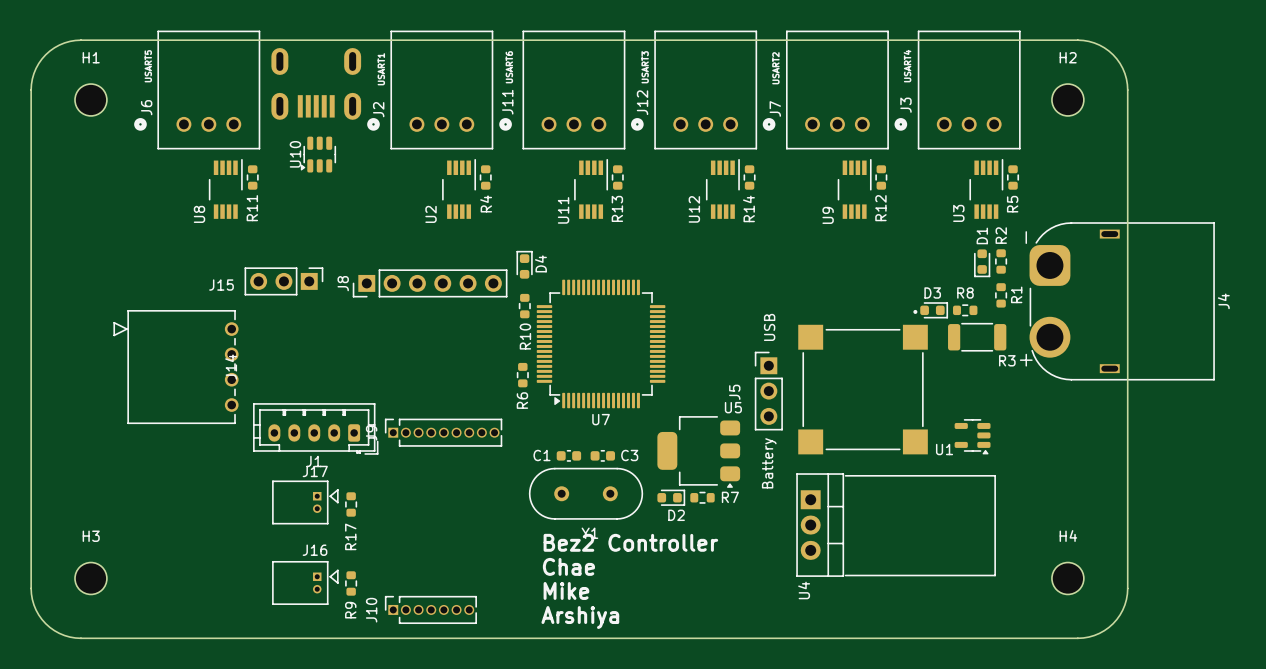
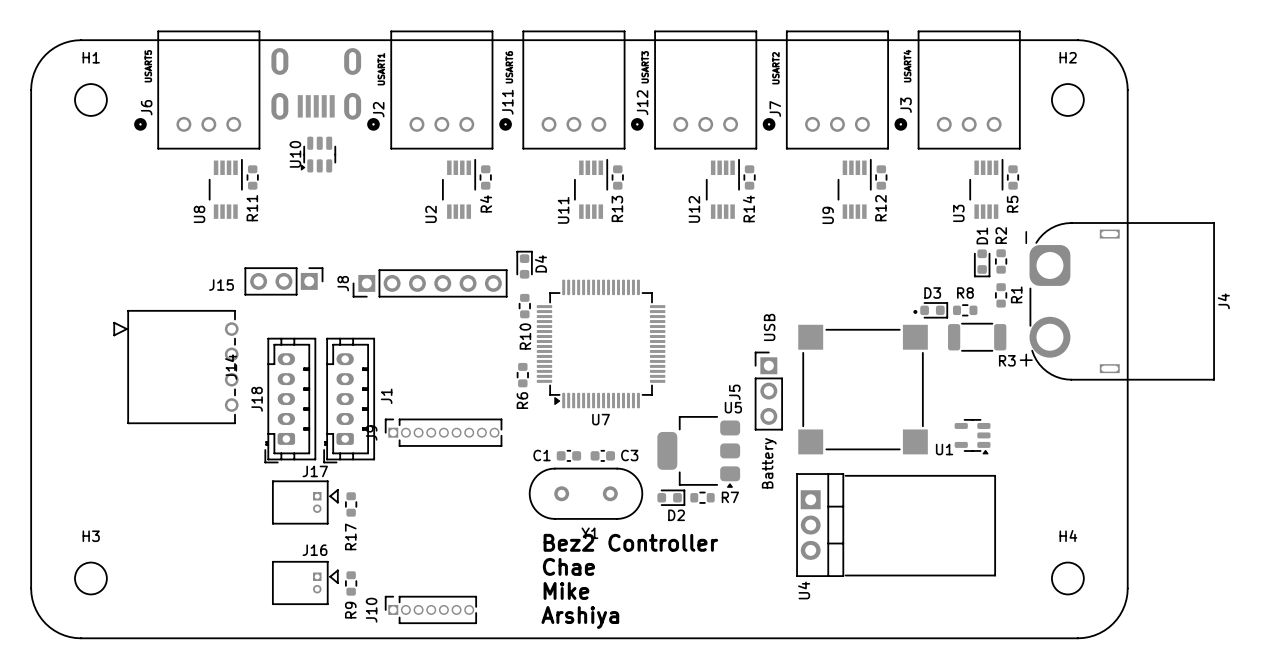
J18: none -> (290, 400)
J1 rotation: 0° (315, 428) -> 90° clockwise (349, 400)
J1 name position: J1 (314, 461) -> J1 (386, 396)

